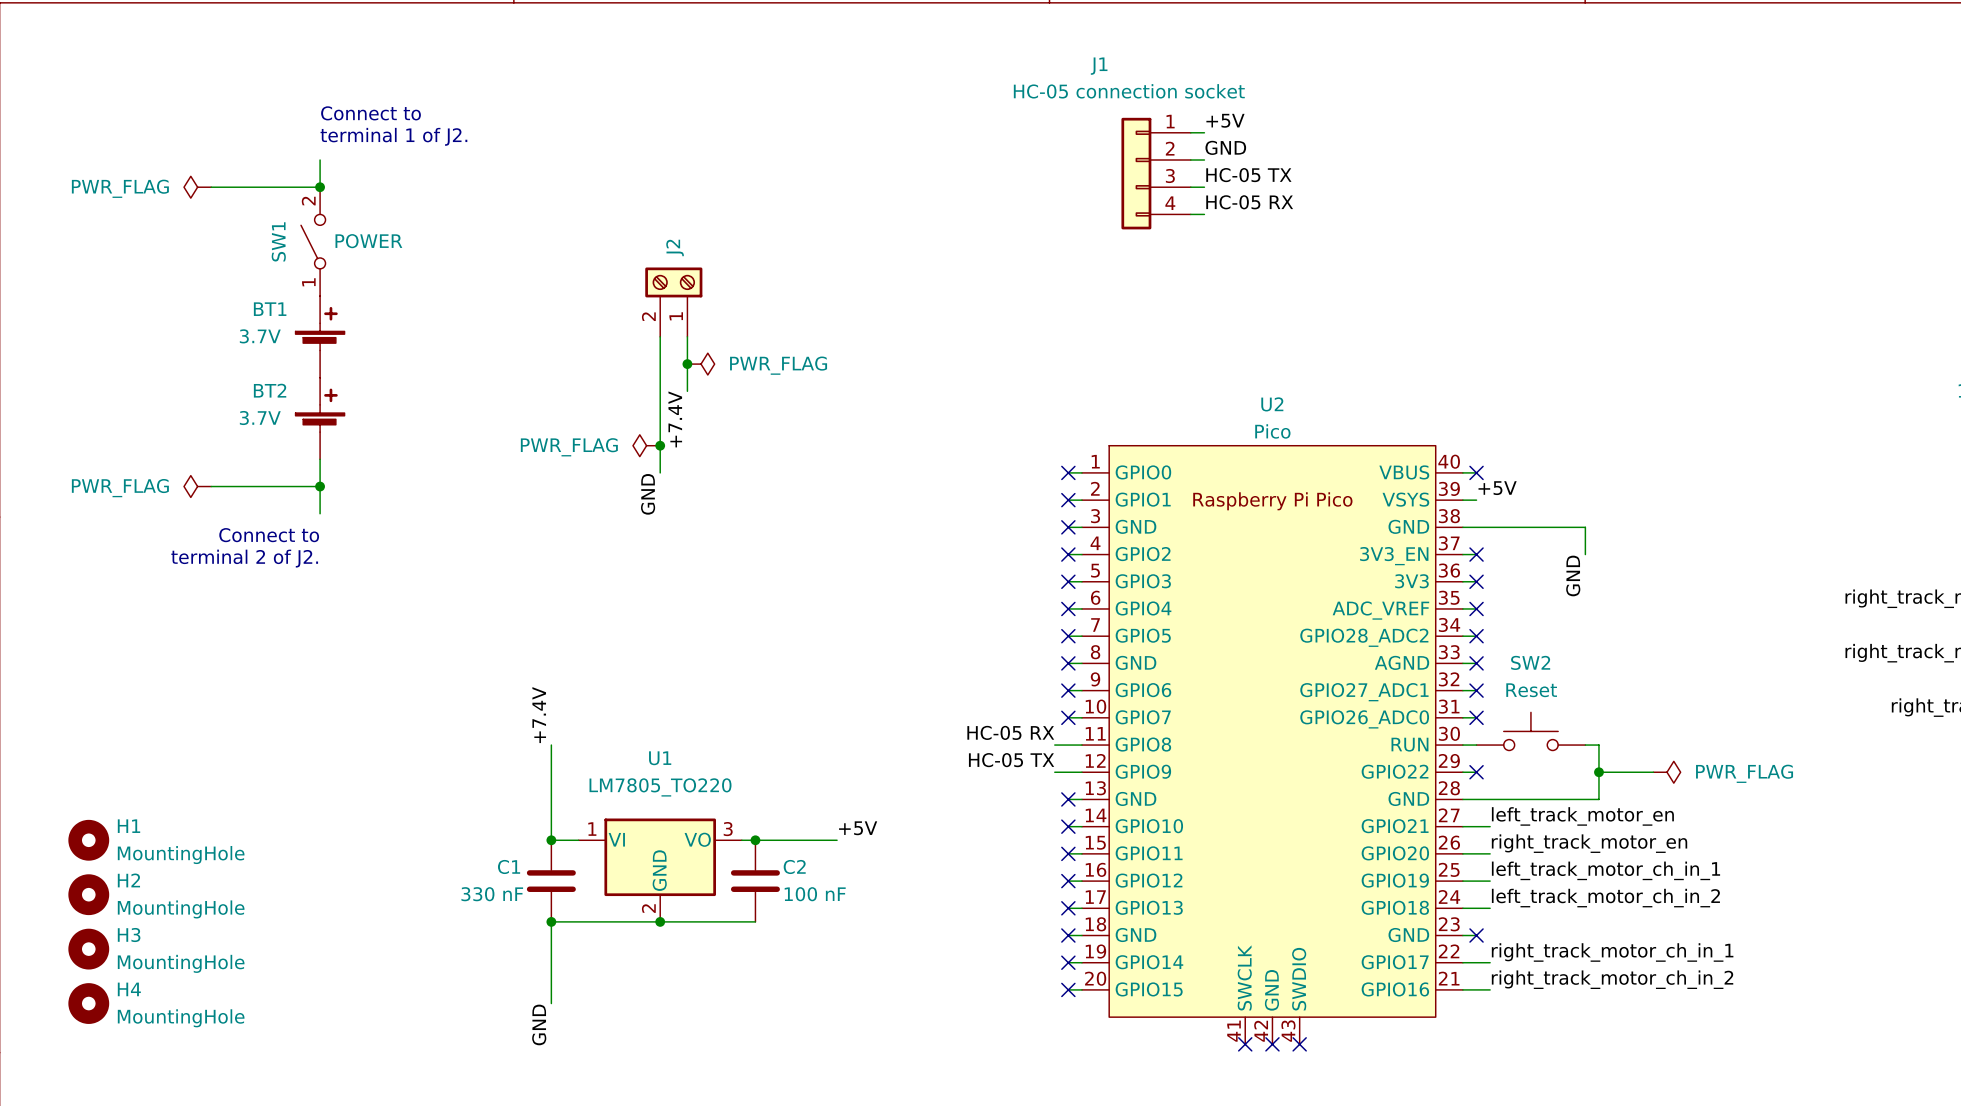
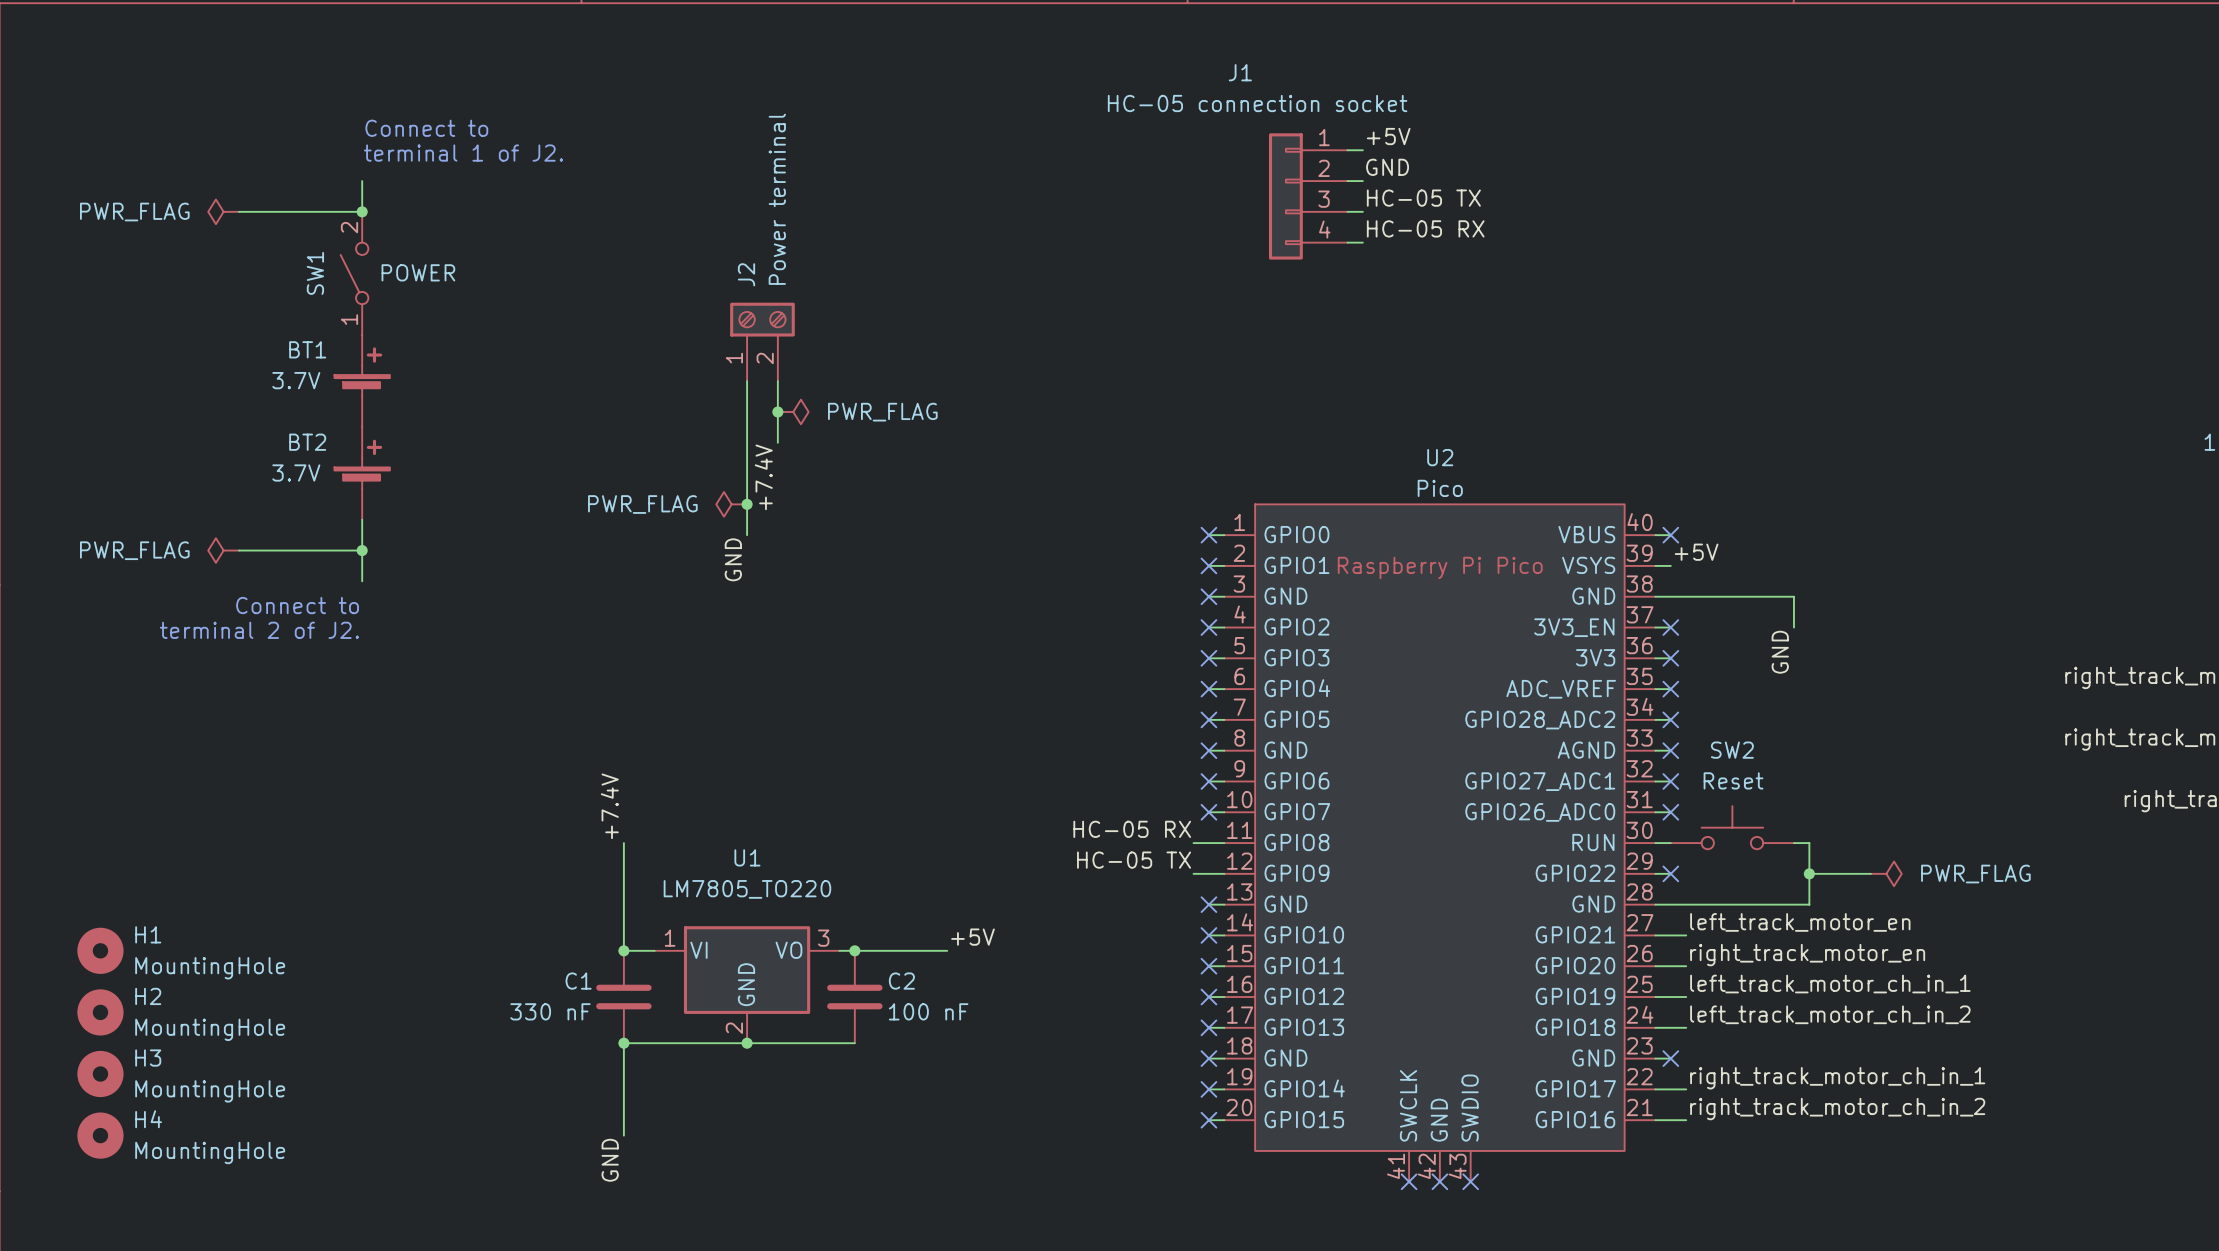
J2 value: none -> Power terminal (777, 199)
J2 flip: as is (673, 282) -> left-right (762, 319)

